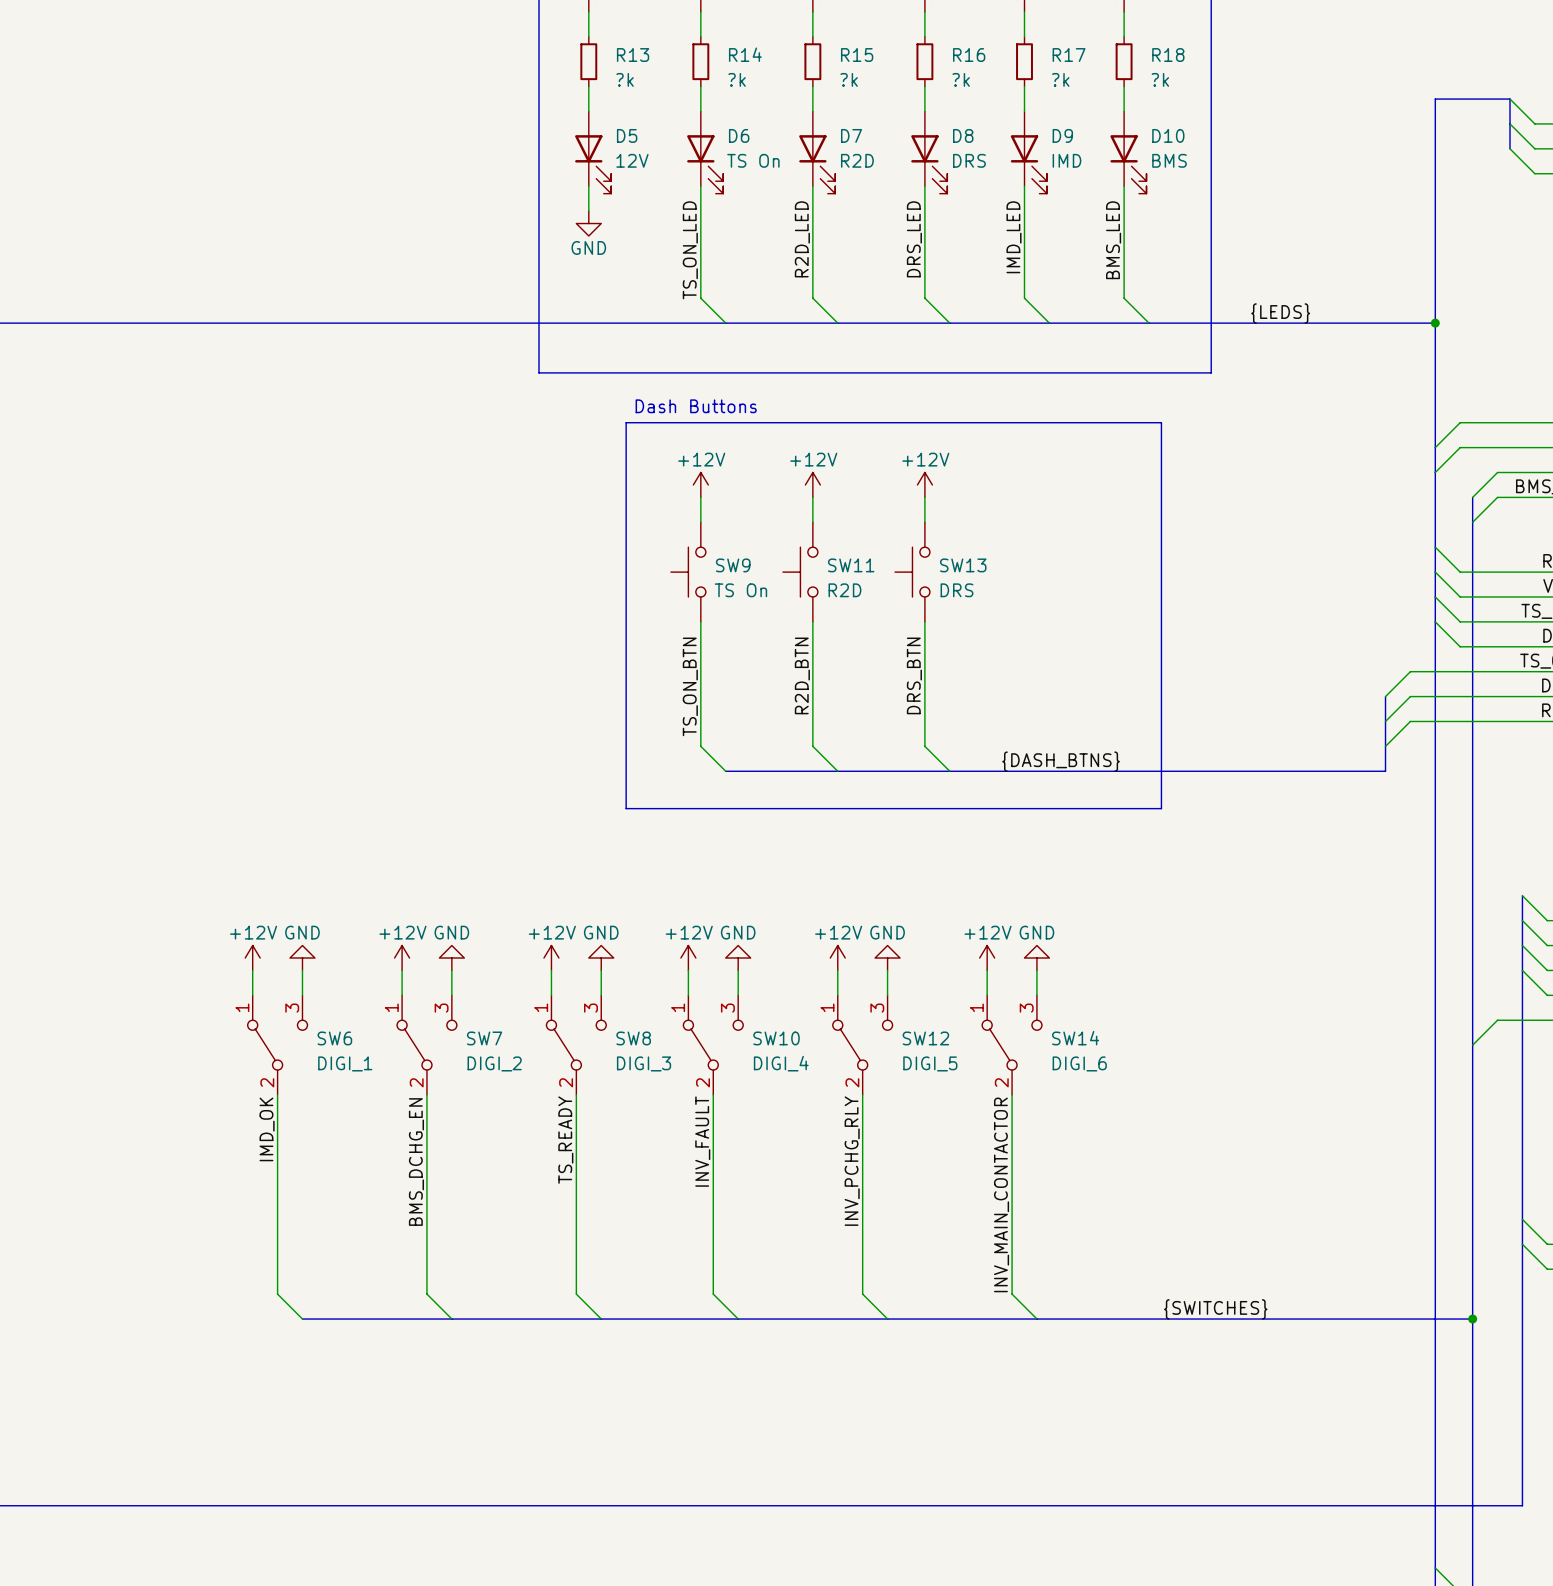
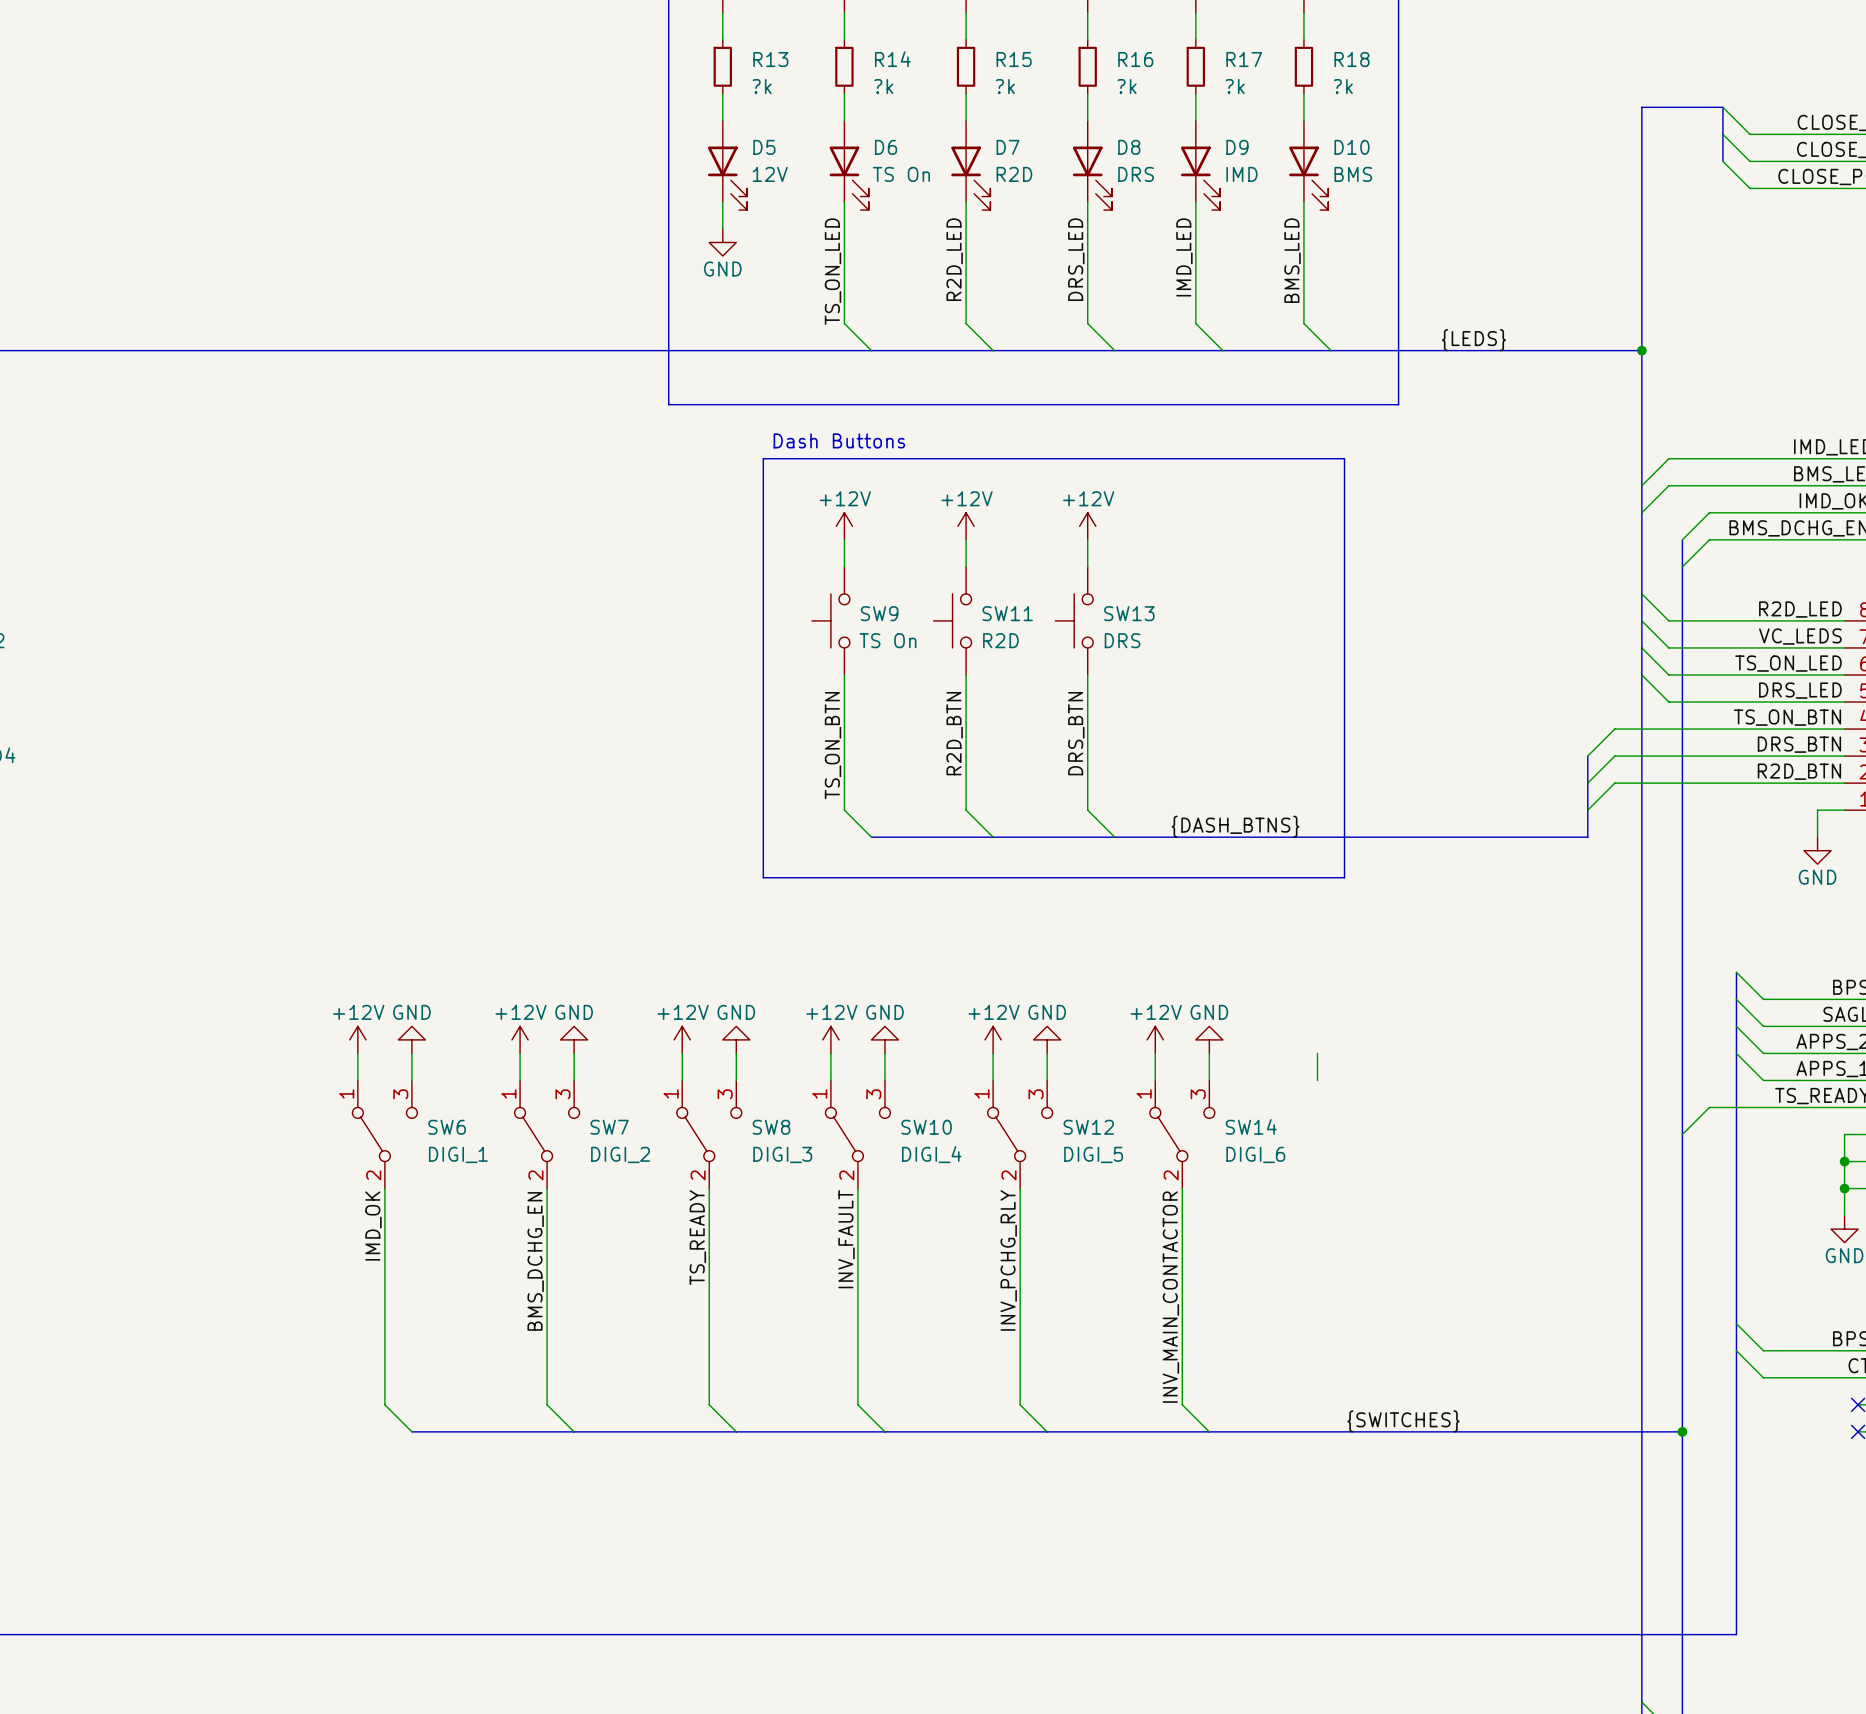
wire: none -> (1317, 1053) (1317, 1080)

